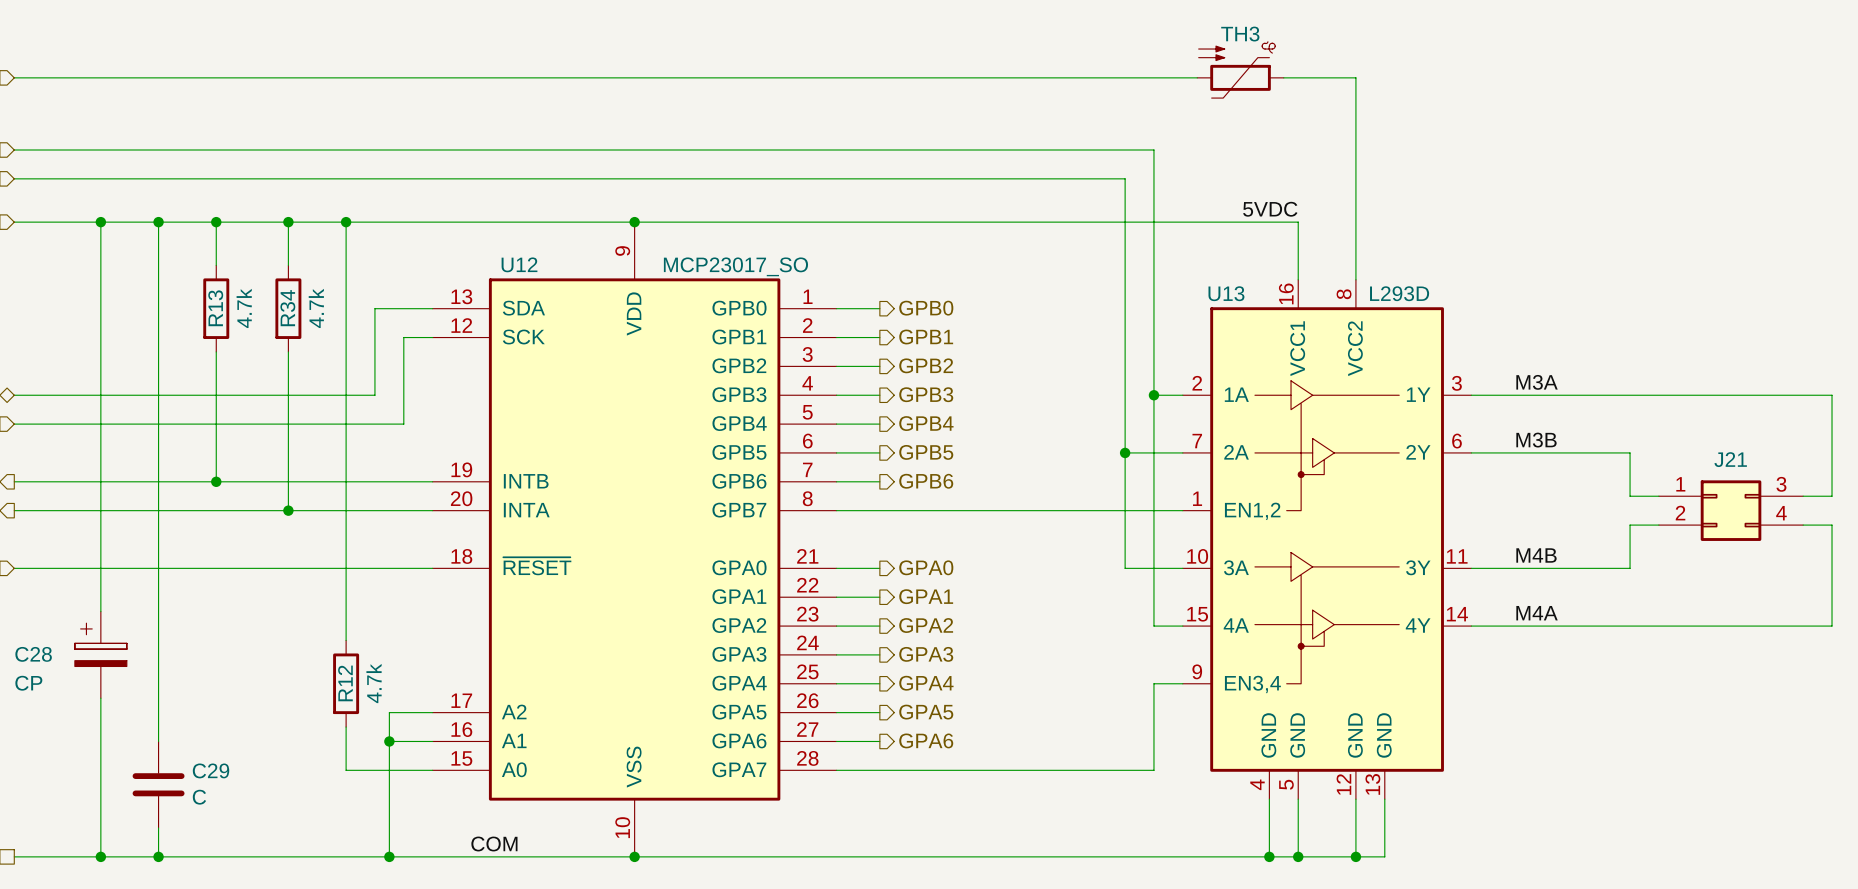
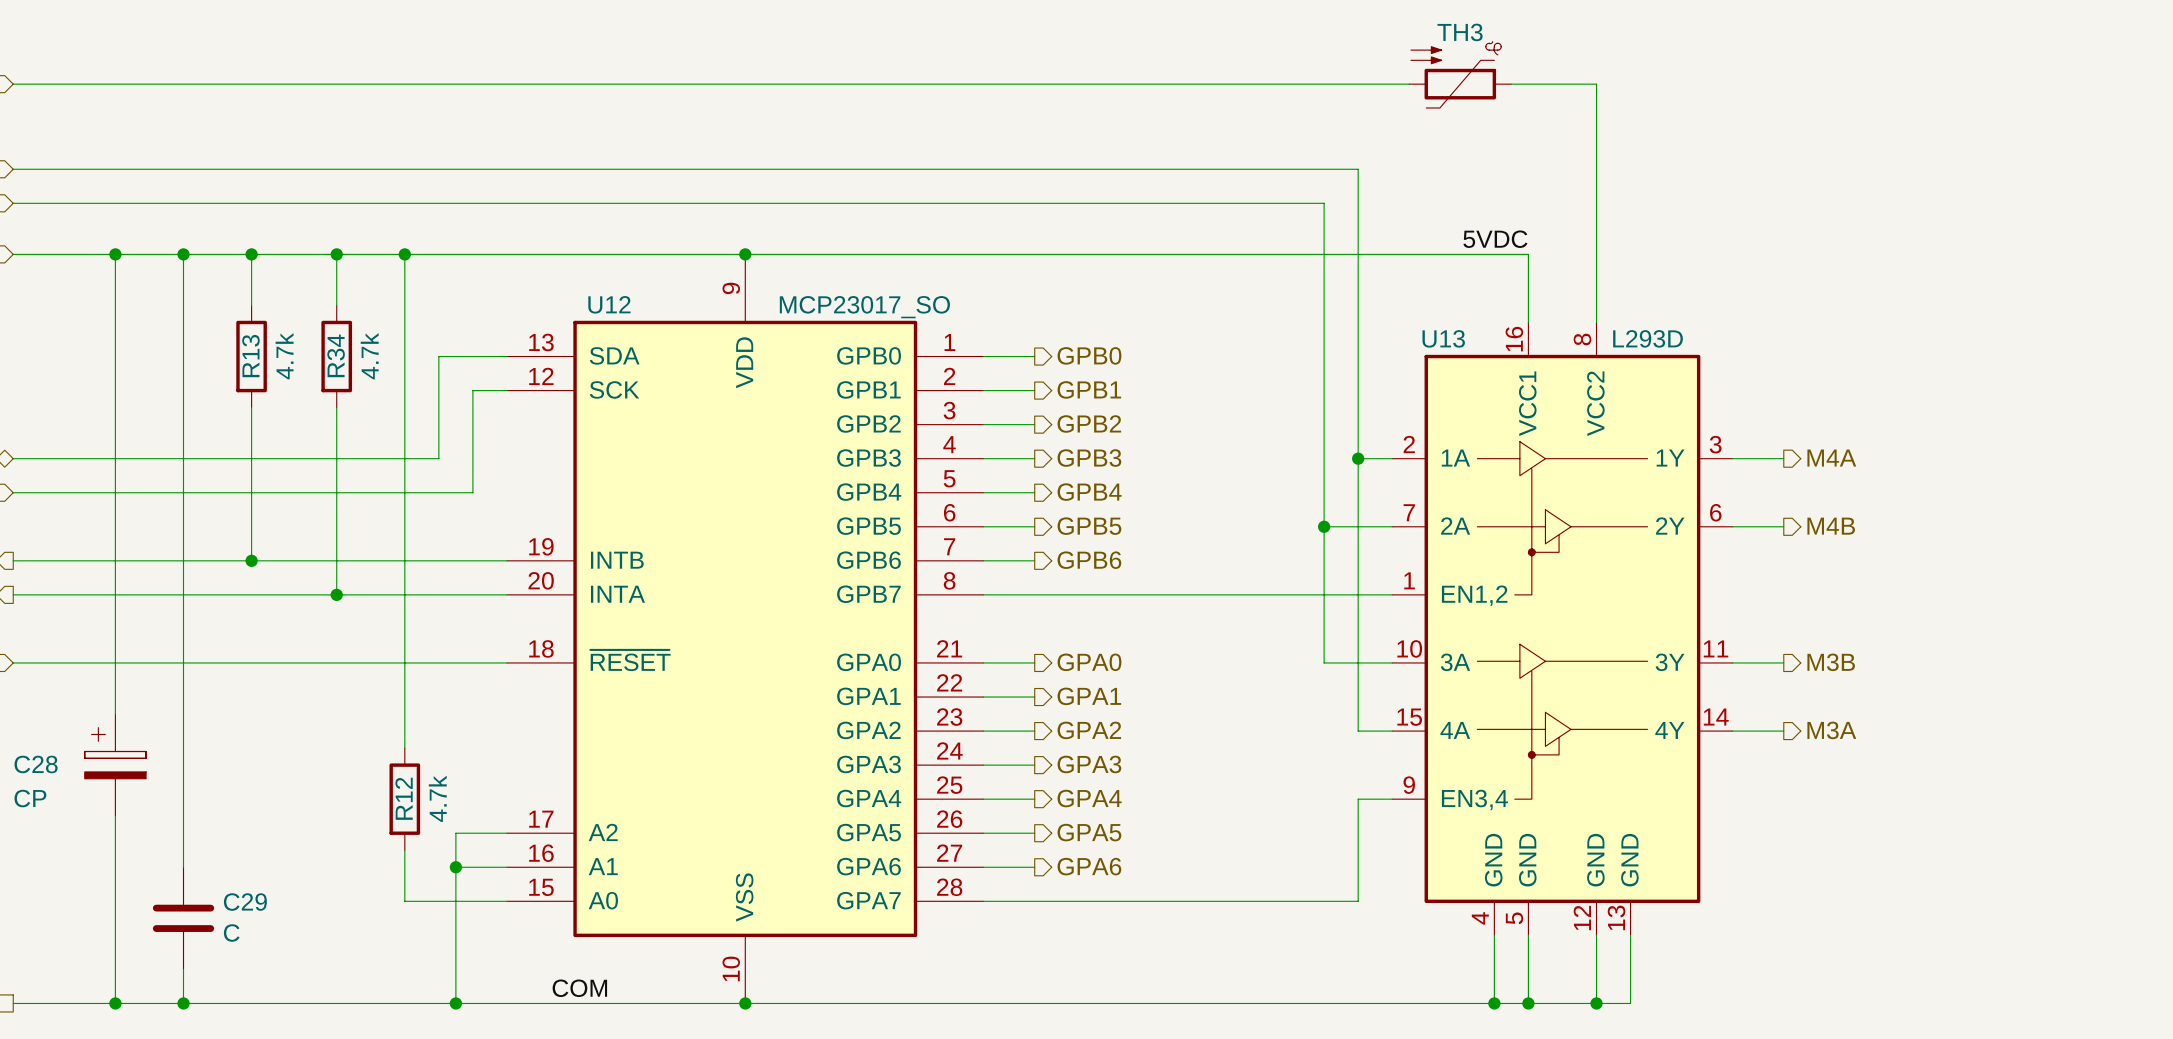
label: M3A (1537, 382) -> none
hierarchical label: none -> M4A (1831, 458)
wire: (1514, 395) (1832, 395) (1832, 496) (1803, 496) -> none
label: M3B (1536, 440) -> none
wire: (1514, 452) (1630, 452) (1630, 496) (1658, 496) -> none
hierarchical label: none -> M4B (1831, 526)
J21: (1731, 510) -> none
wire: (1658, 525) (1630, 525) (1630, 568) (1514, 568) -> none
wire: (1803, 525) (1832, 525) (1832, 626) (1514, 626) -> none
label: M4B (1536, 555) -> none
hierarchical label: none -> M3B (1831, 662)
label: M4A (1537, 613) -> none
hierarchical label: none -> M3A (1831, 730)

